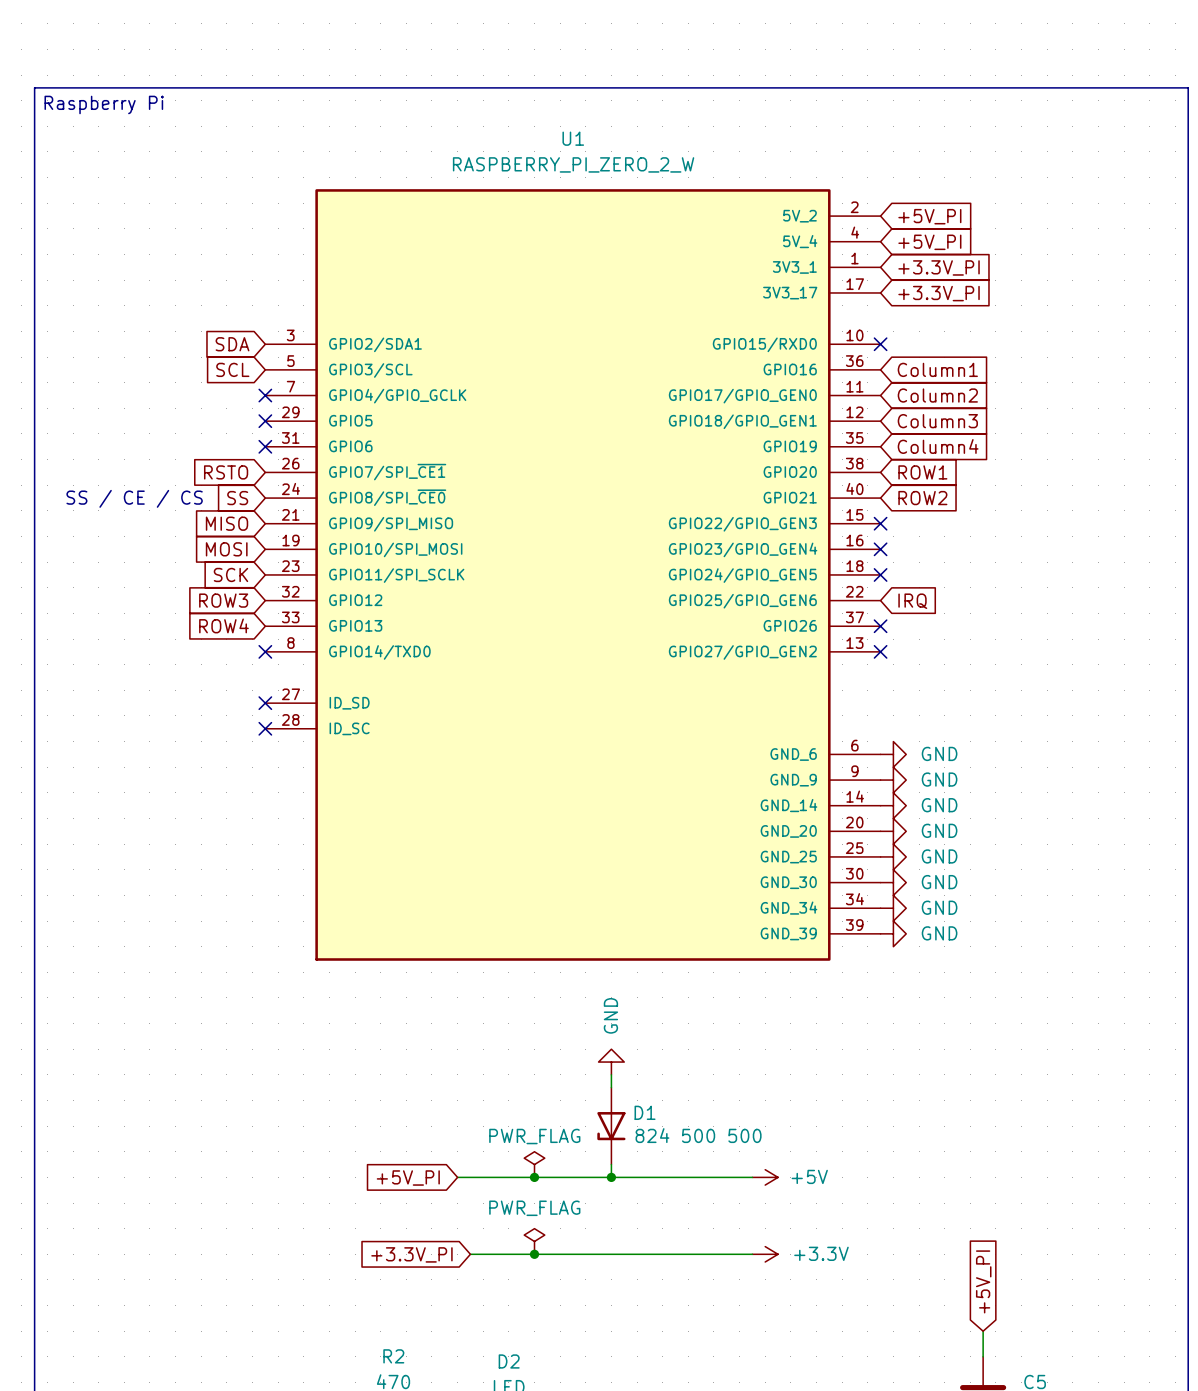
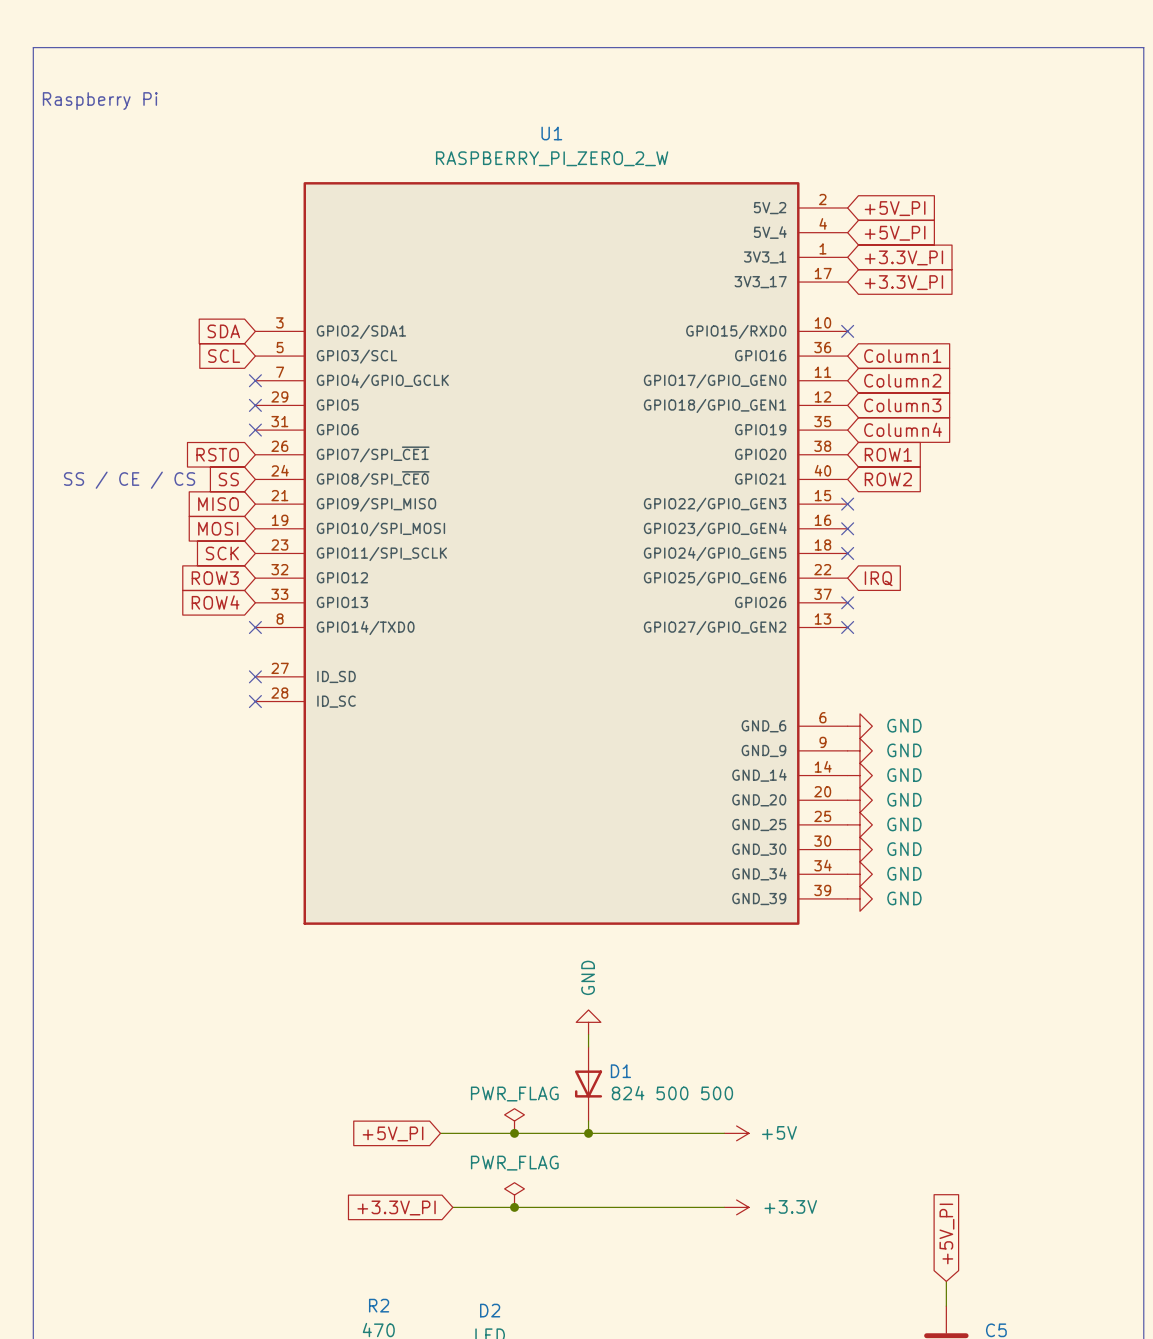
line: (34, 87) (1188, 87) -> (33, 84) (33, 47) (1143, 47) (1143, 84)

